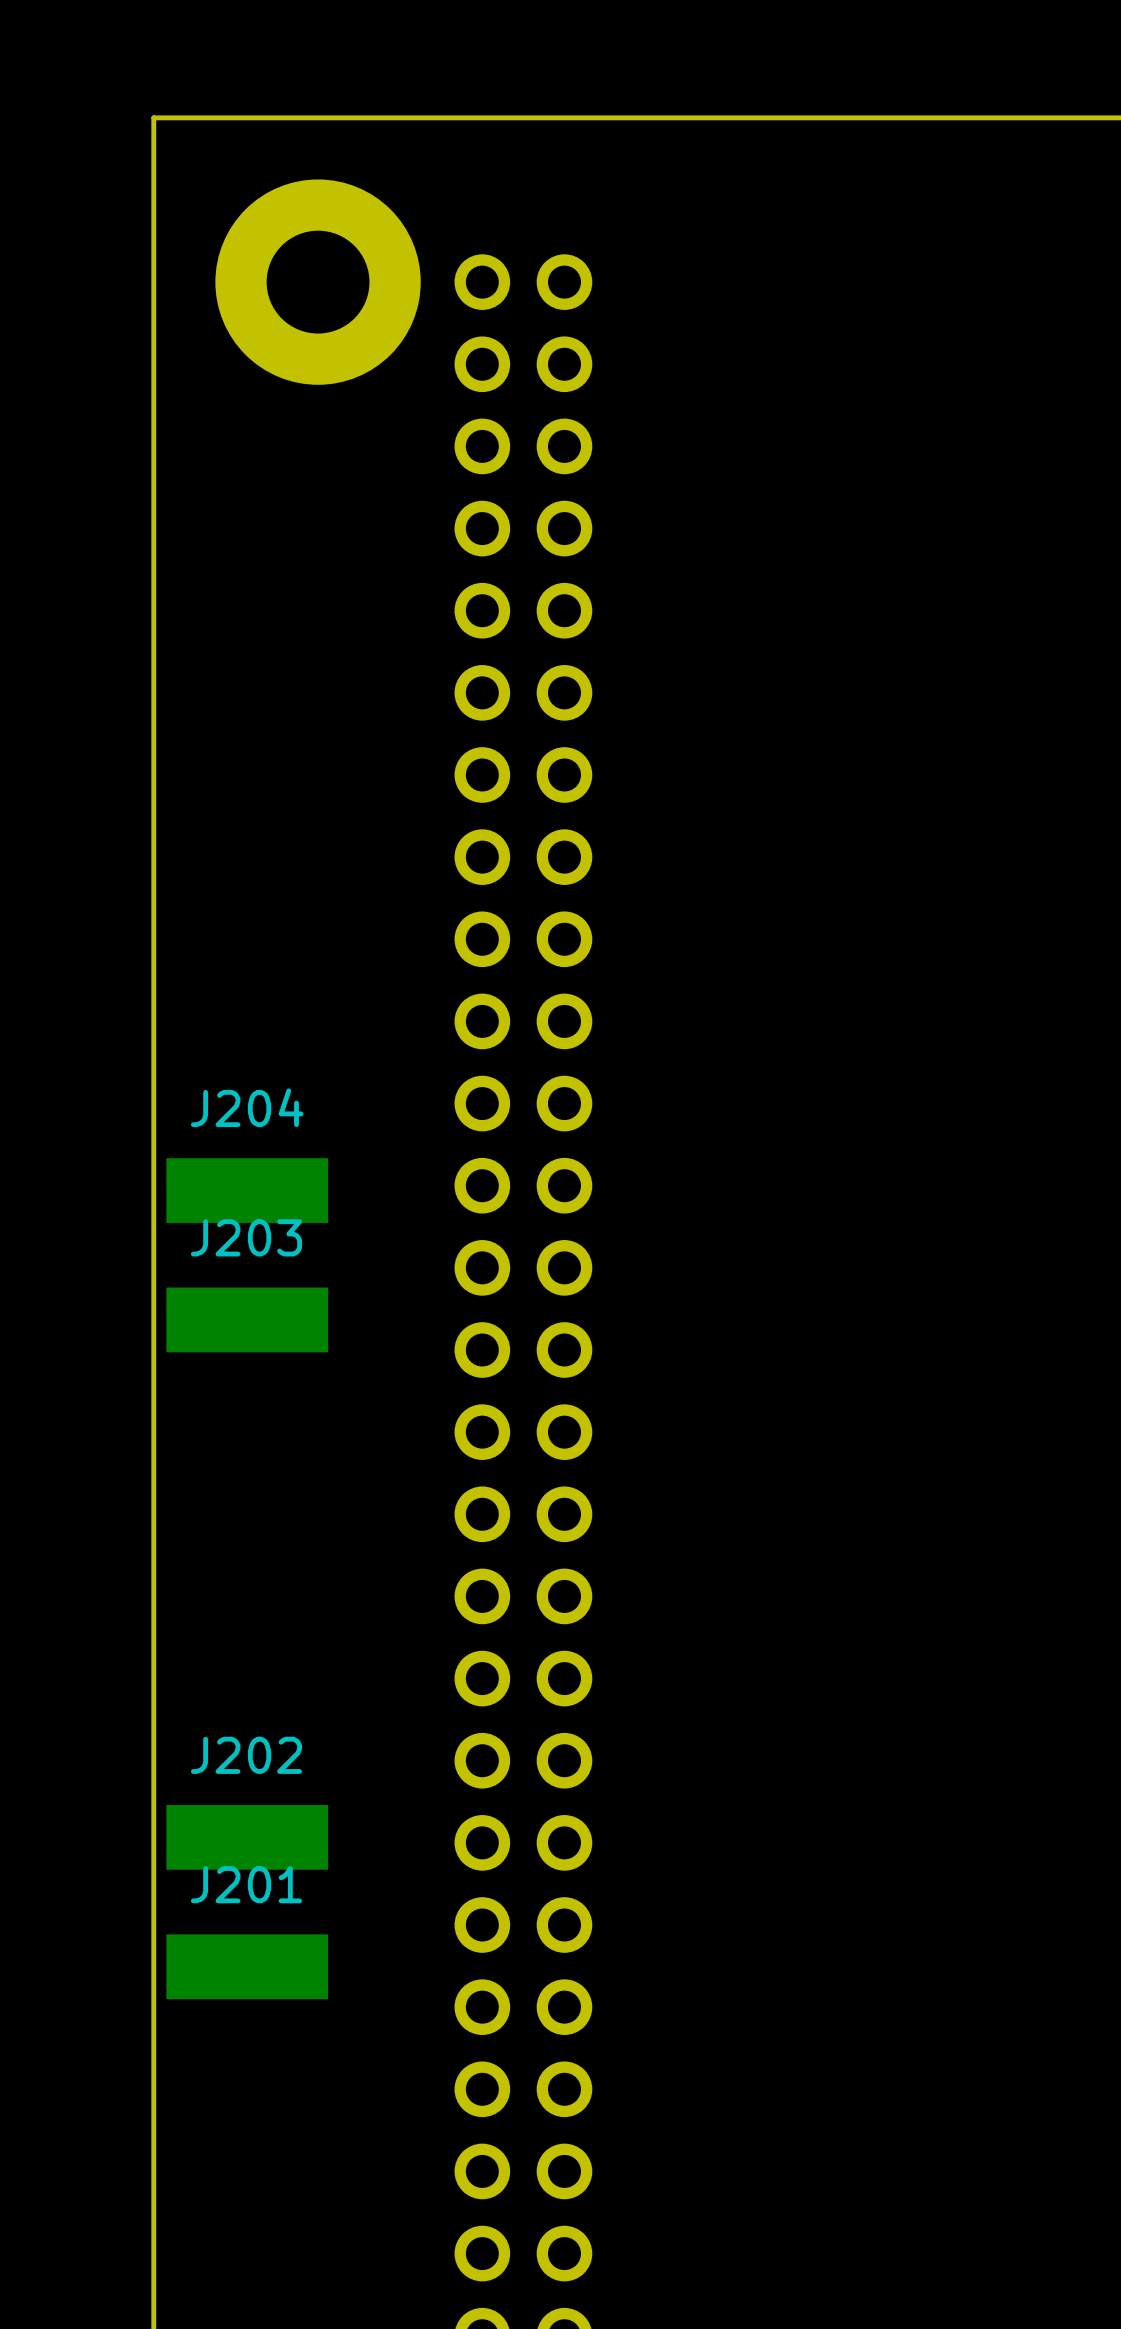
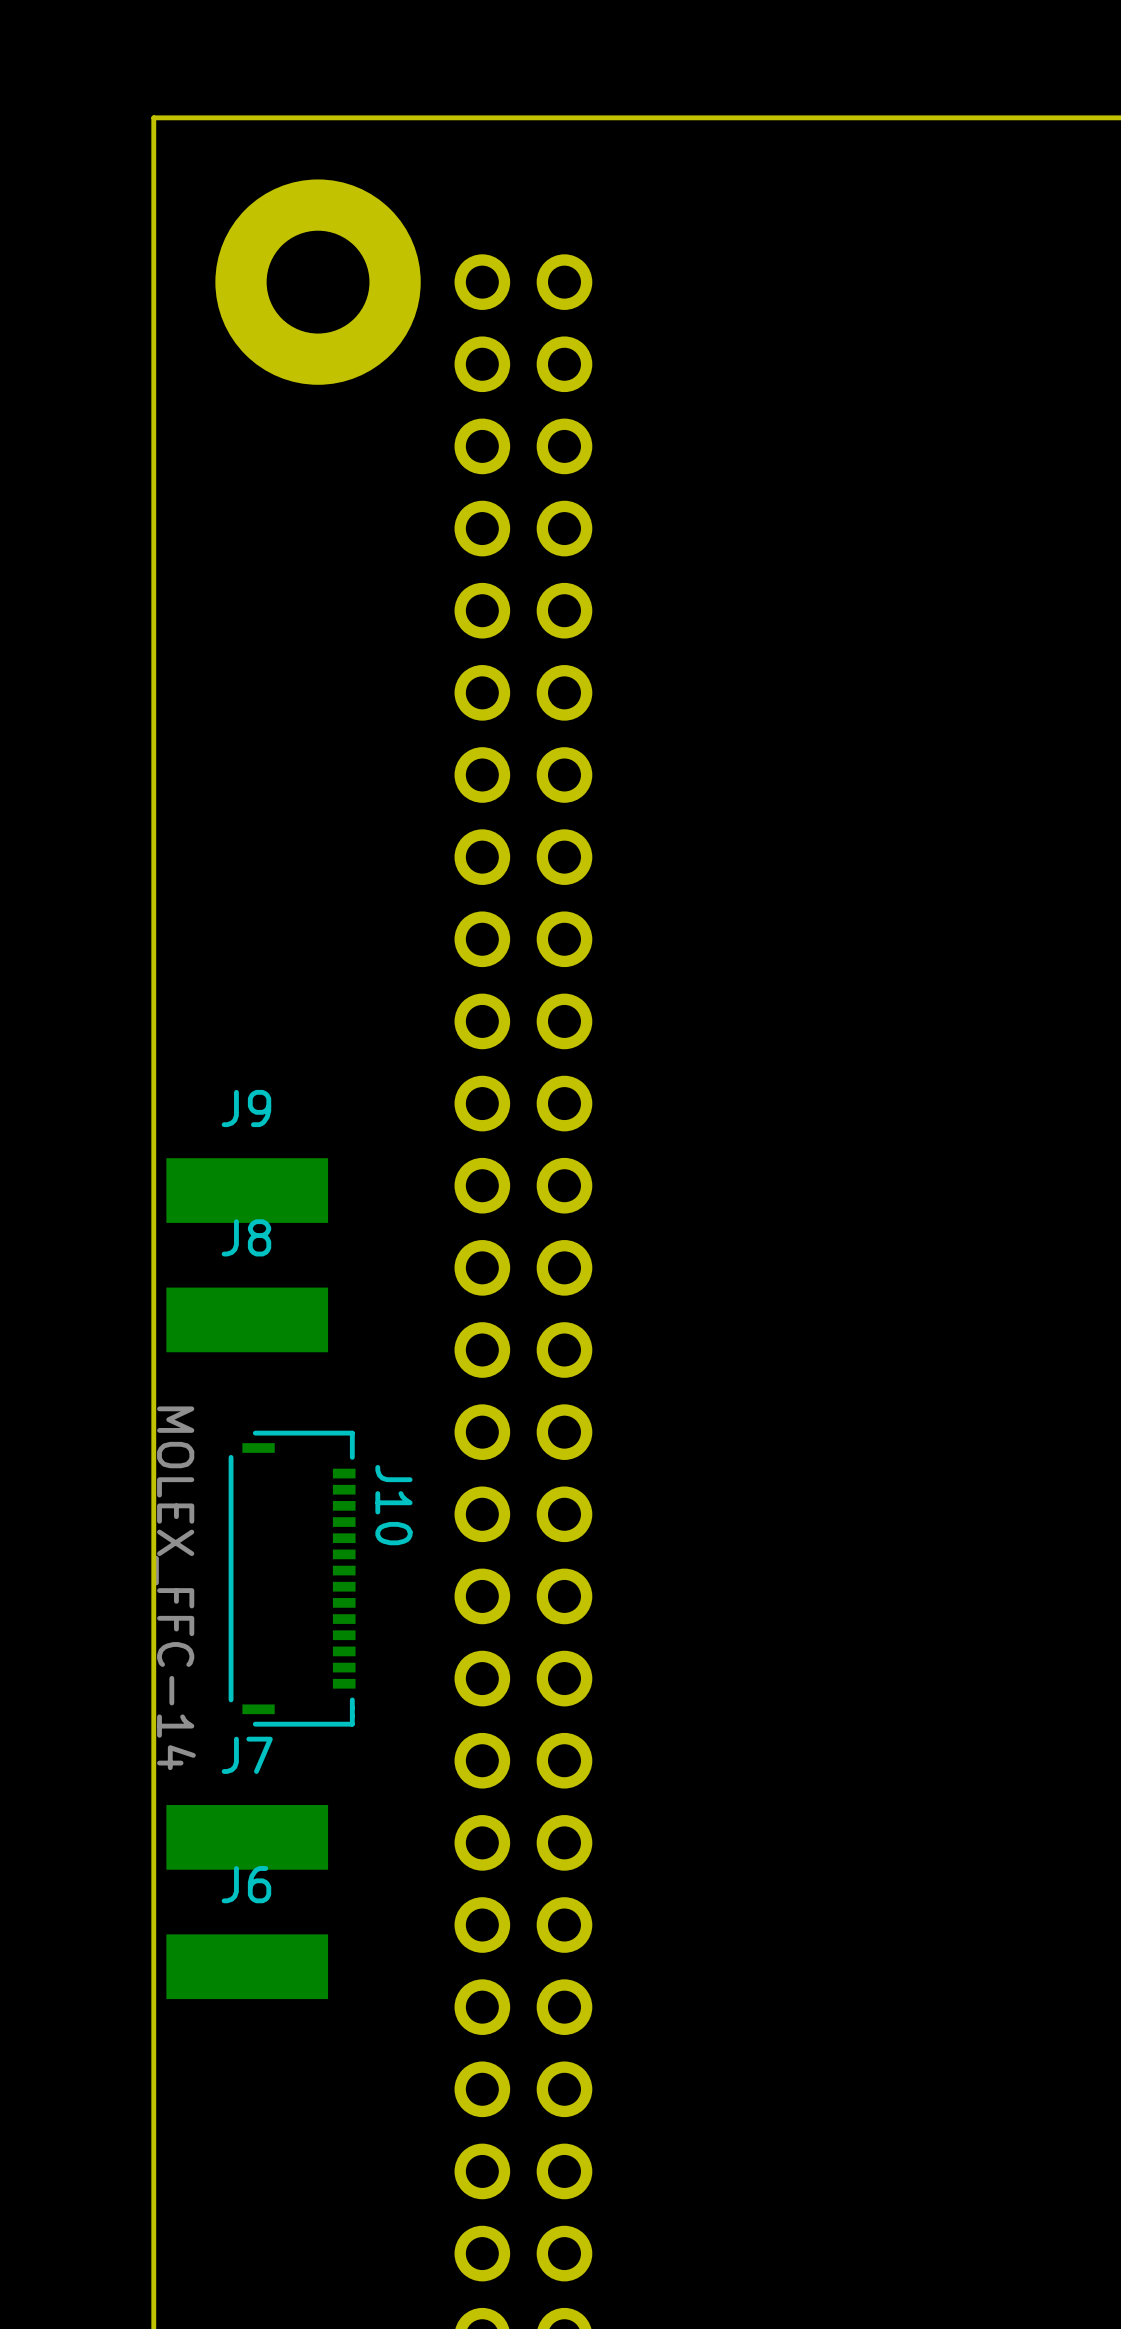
J204 name: J204 (247, 1107) -> J9 (246, 1108)
J203 name: J203 (246, 1237) -> J8 (246, 1237)
J10: none -> MOLEX_FFC-14 (292, 1578)
J202 name: J202 (246, 1755) -> J7 (247, 1755)
J201 name: J201 (246, 1884) -> J6 (246, 1884)

